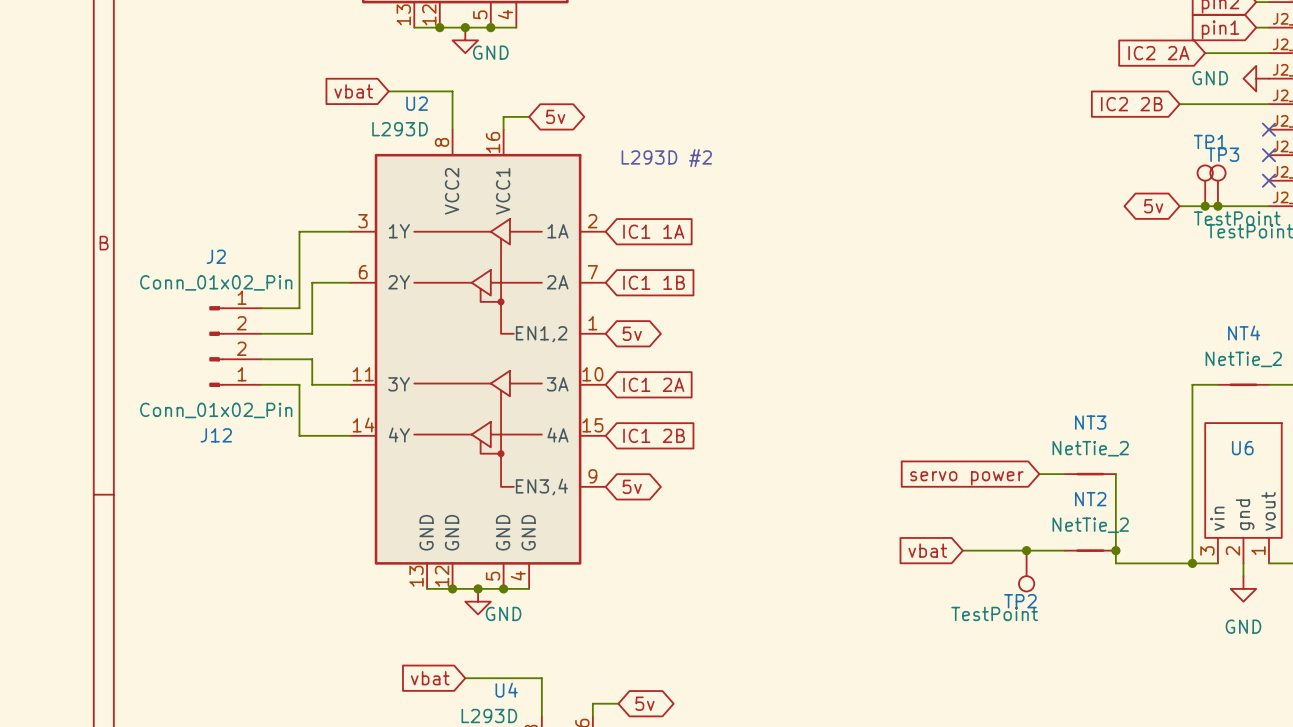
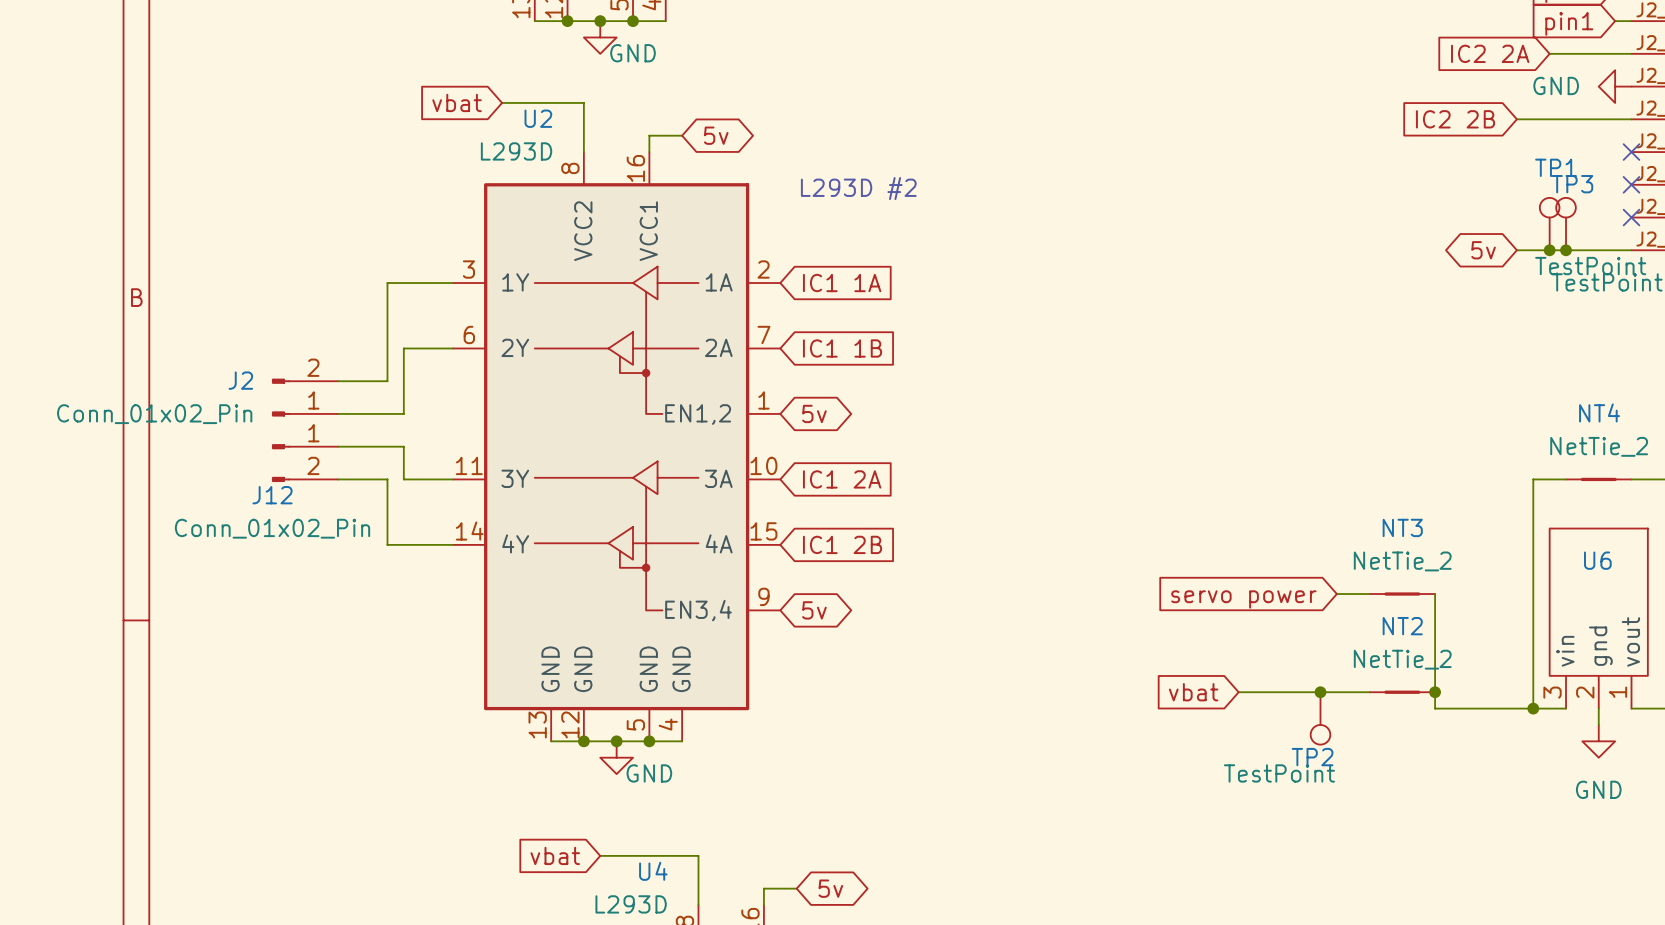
J2 name position: J2 (216, 256) -> J2 (240, 380)
J2 value position: Conn_01x02_Pin (216, 282) -> Conn_01x02_Pin (154, 414)
J2 flip: as is (216, 321) -> up-down (281, 397)
J12 flip: as is (216, 372) -> up-down (281, 463)
J12 name position: J12 (216, 435) -> J12 (272, 495)

